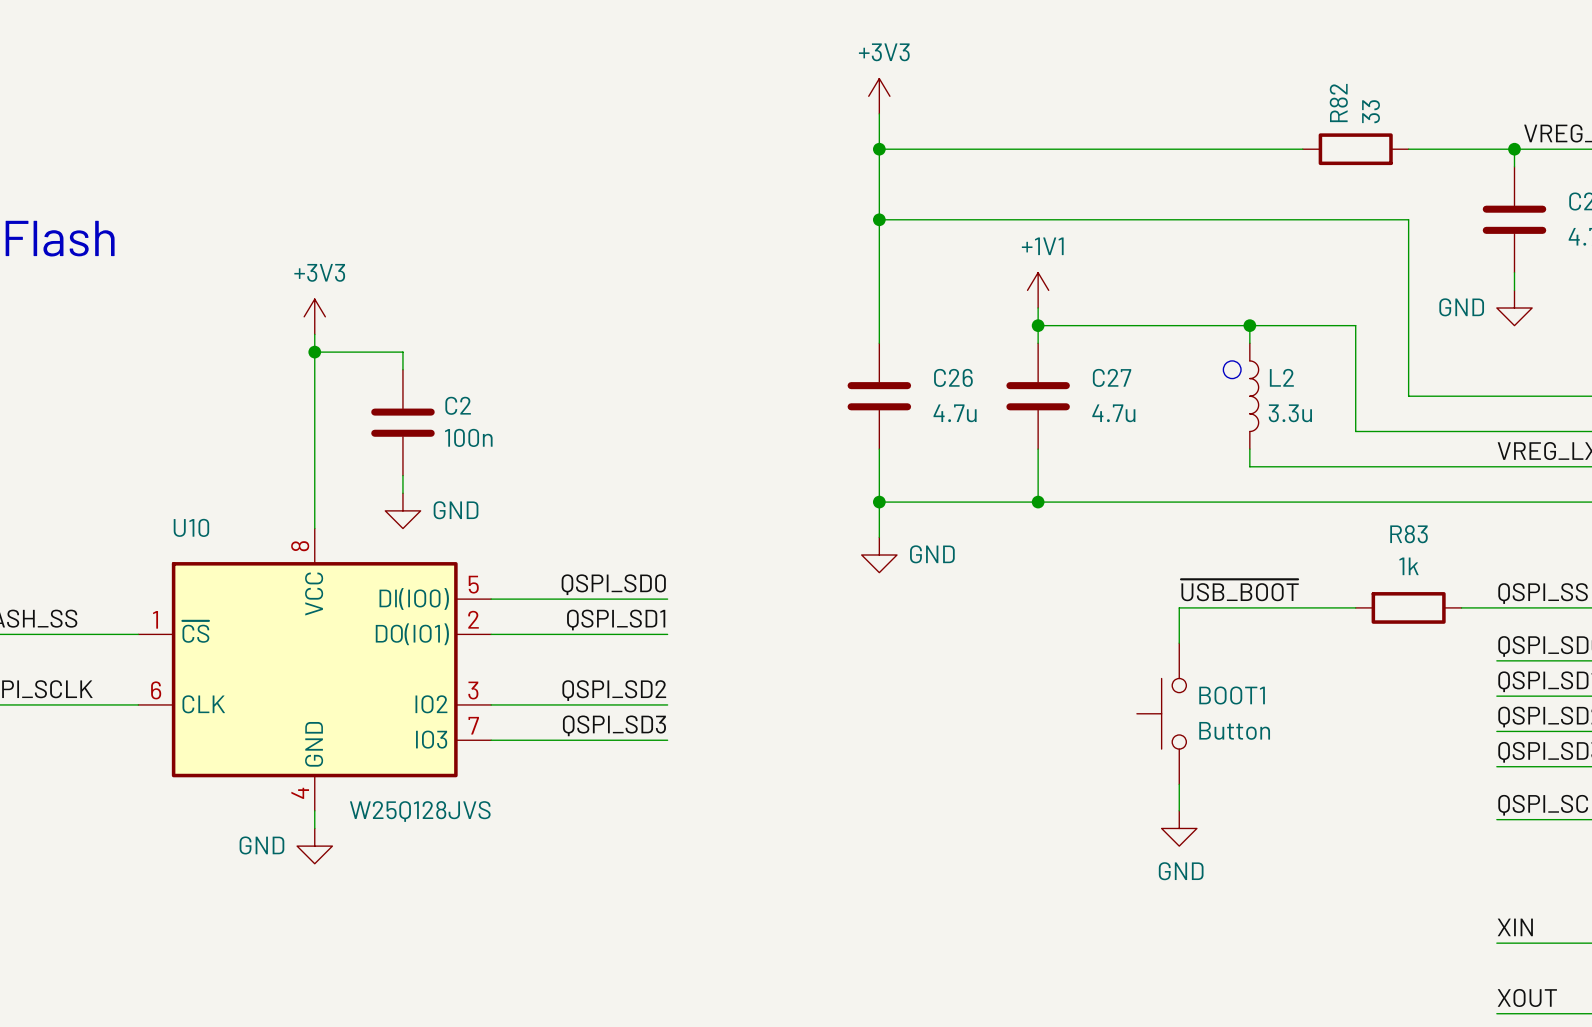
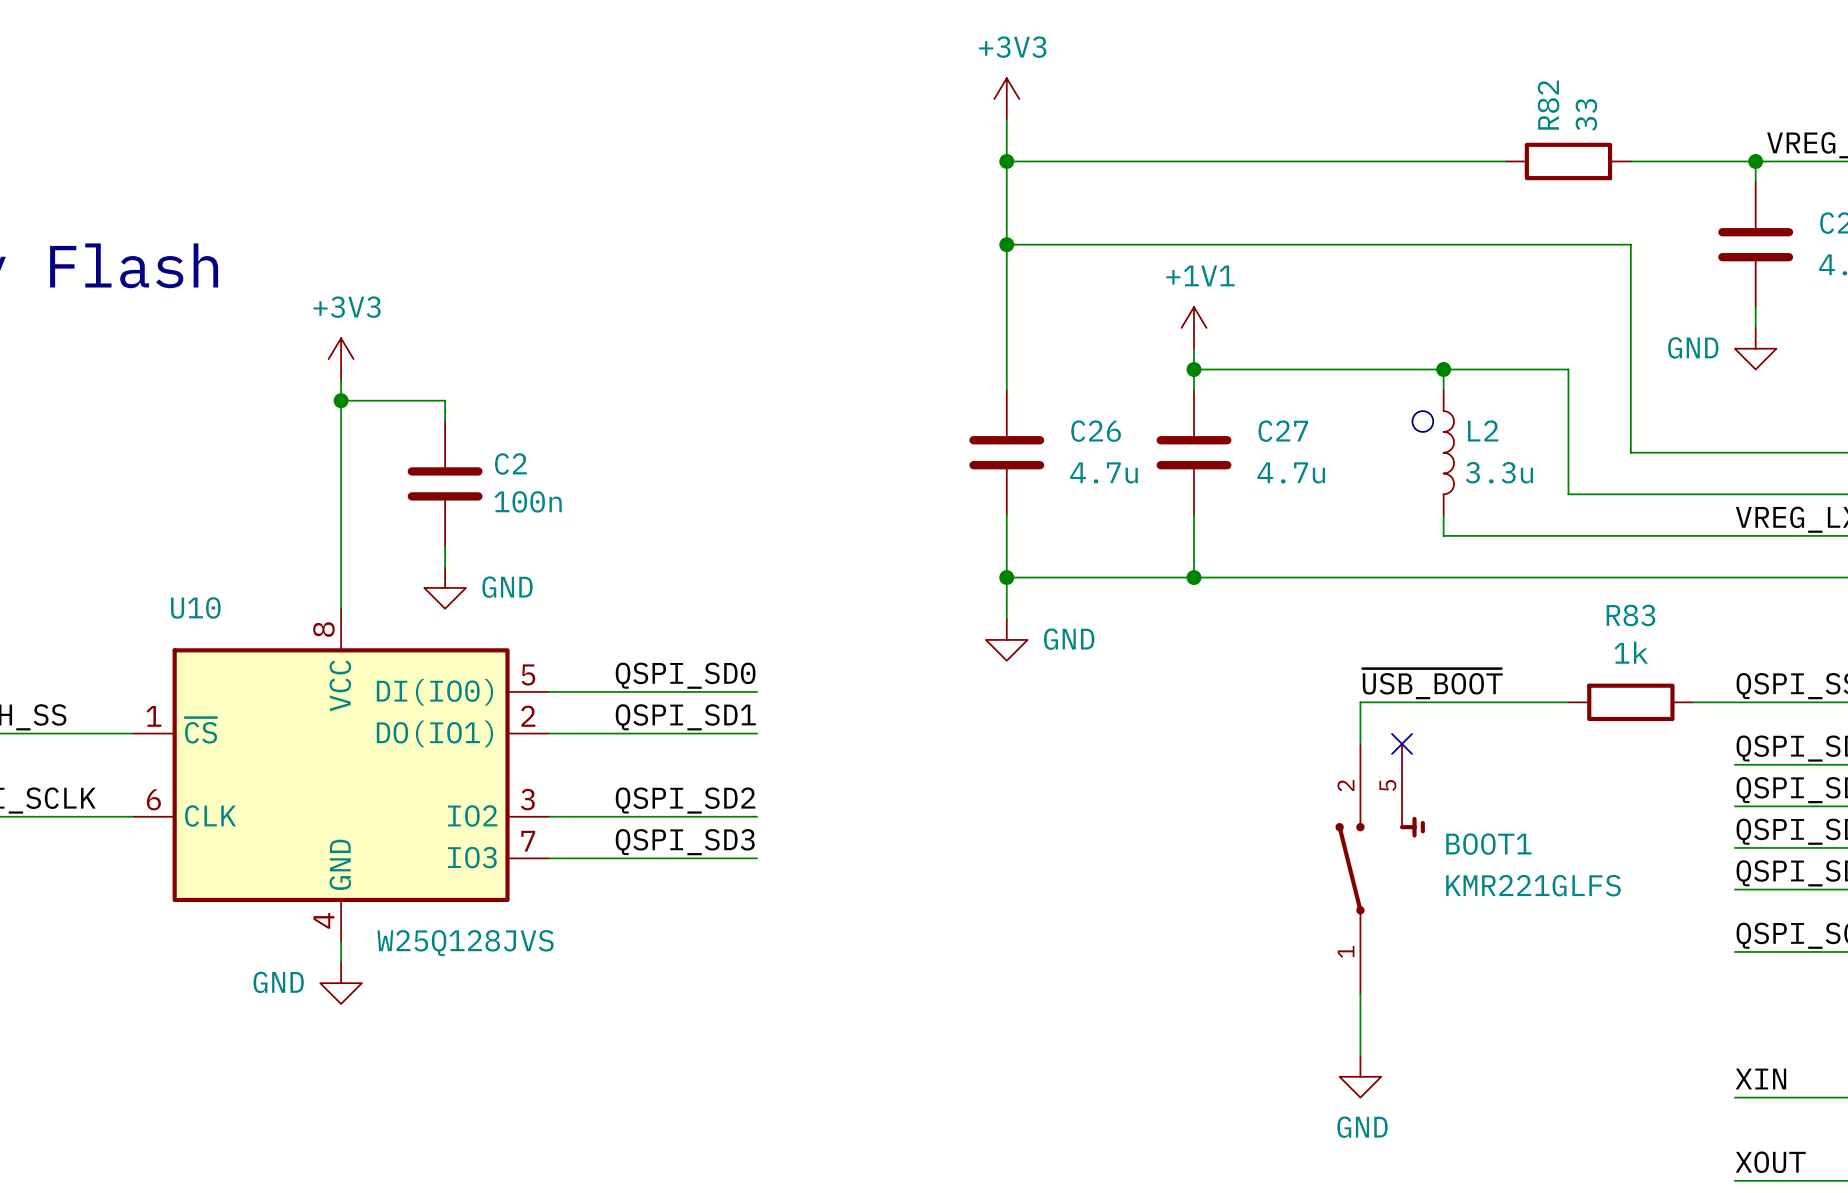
BOOT1 symbol: [1136, 643, 1187, 785] -> [1335, 743, 1425, 994]
no-connect mark: none -> (1402, 743)
BOOT1 value: Button (1234, 730) -> KMR221GLFS (1533, 885)
power symbol position: GND (1179, 828) -> GND (1360, 1076)
wire: none -> (1360, 993) (1360, 1055)

